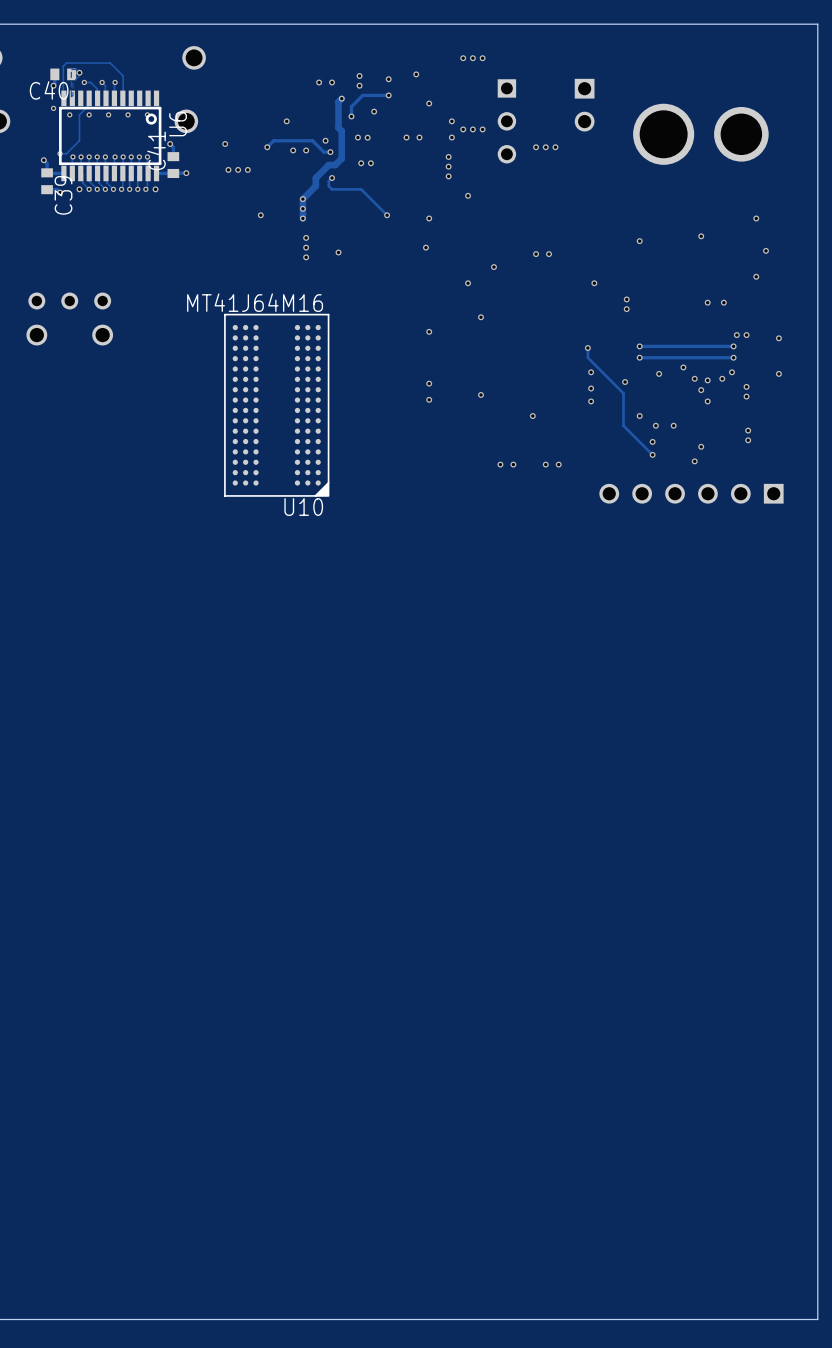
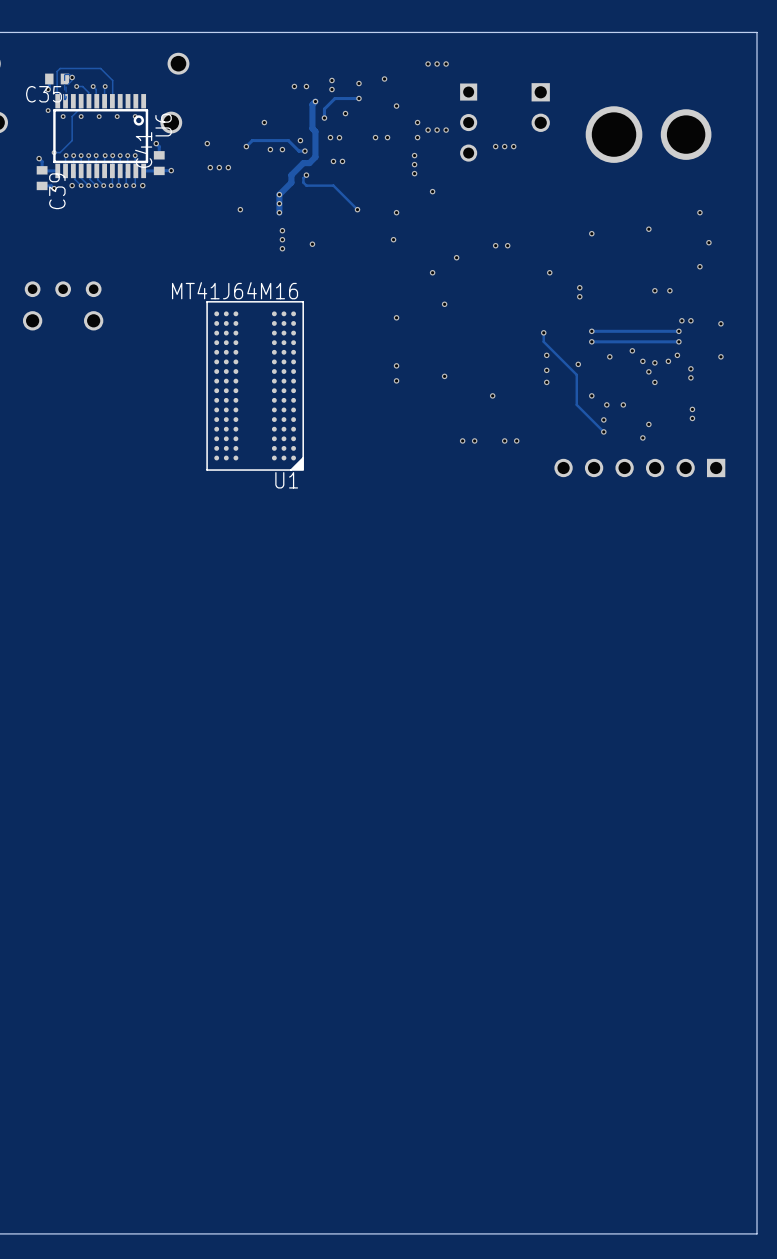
C40 name: C40 (49, 90) -> C35 (44, 94)
U10 name: U10 (303, 507) -> U1 (286, 480)

